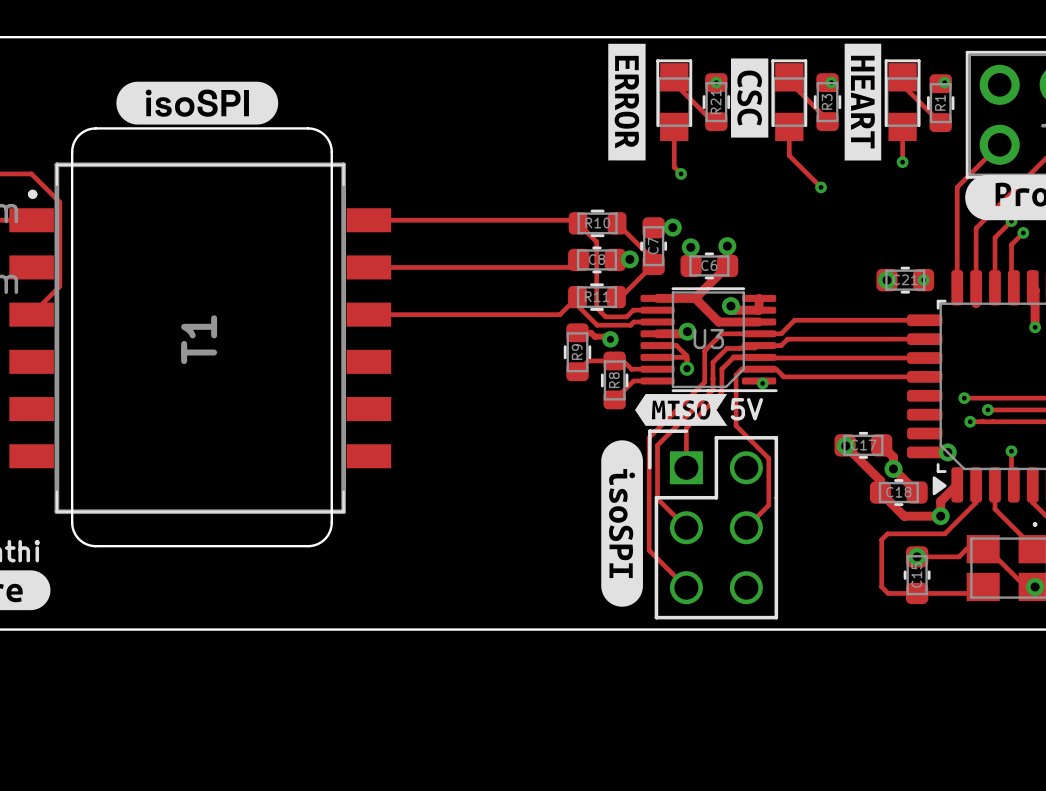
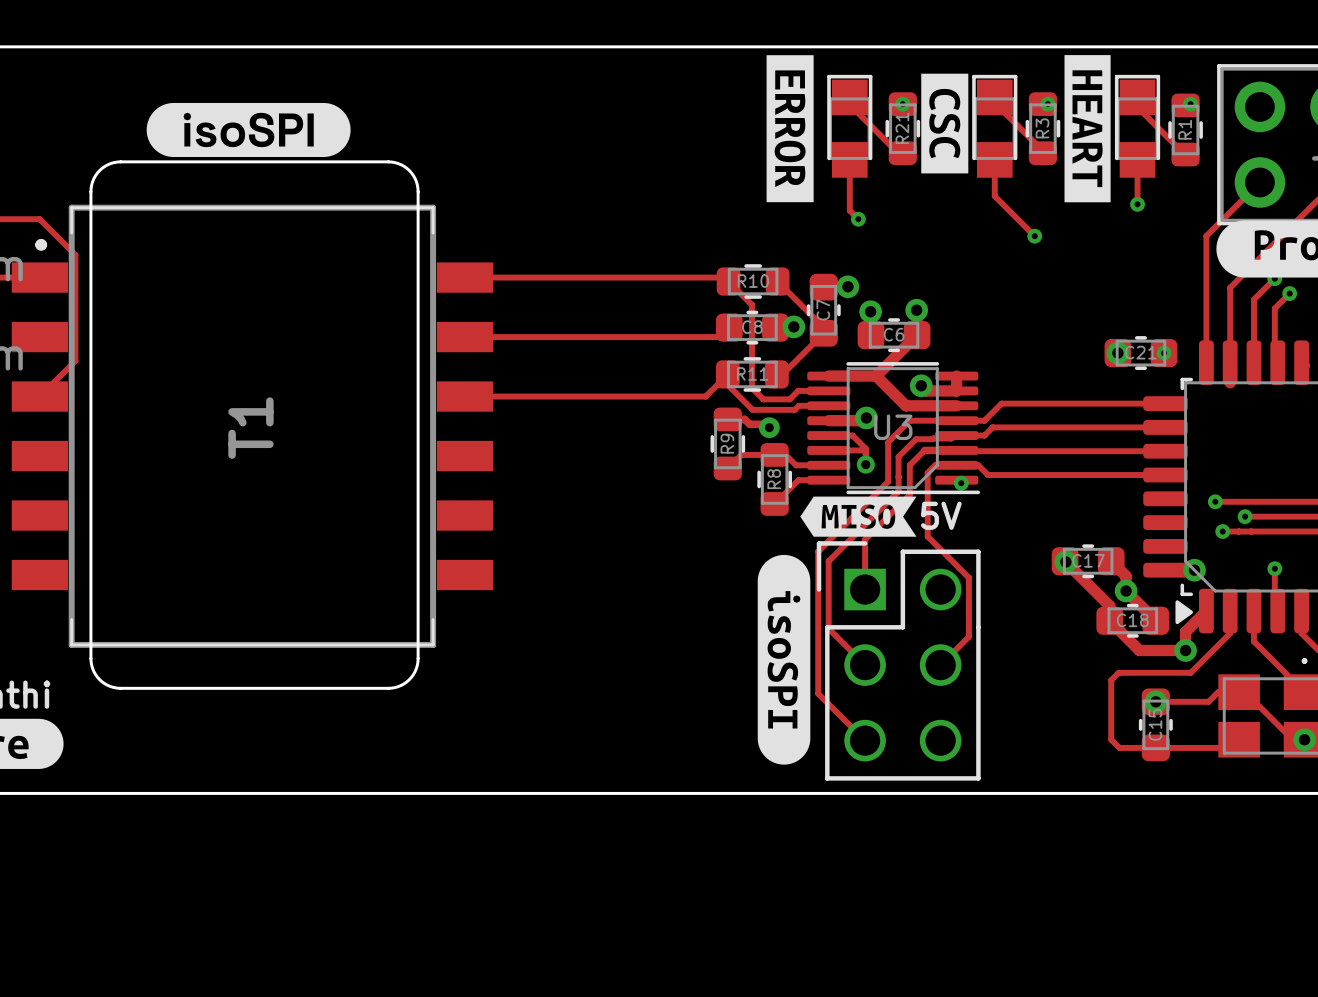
track: (1035, 290) (1035, 327) -> none
via: (1035, 327) -> none

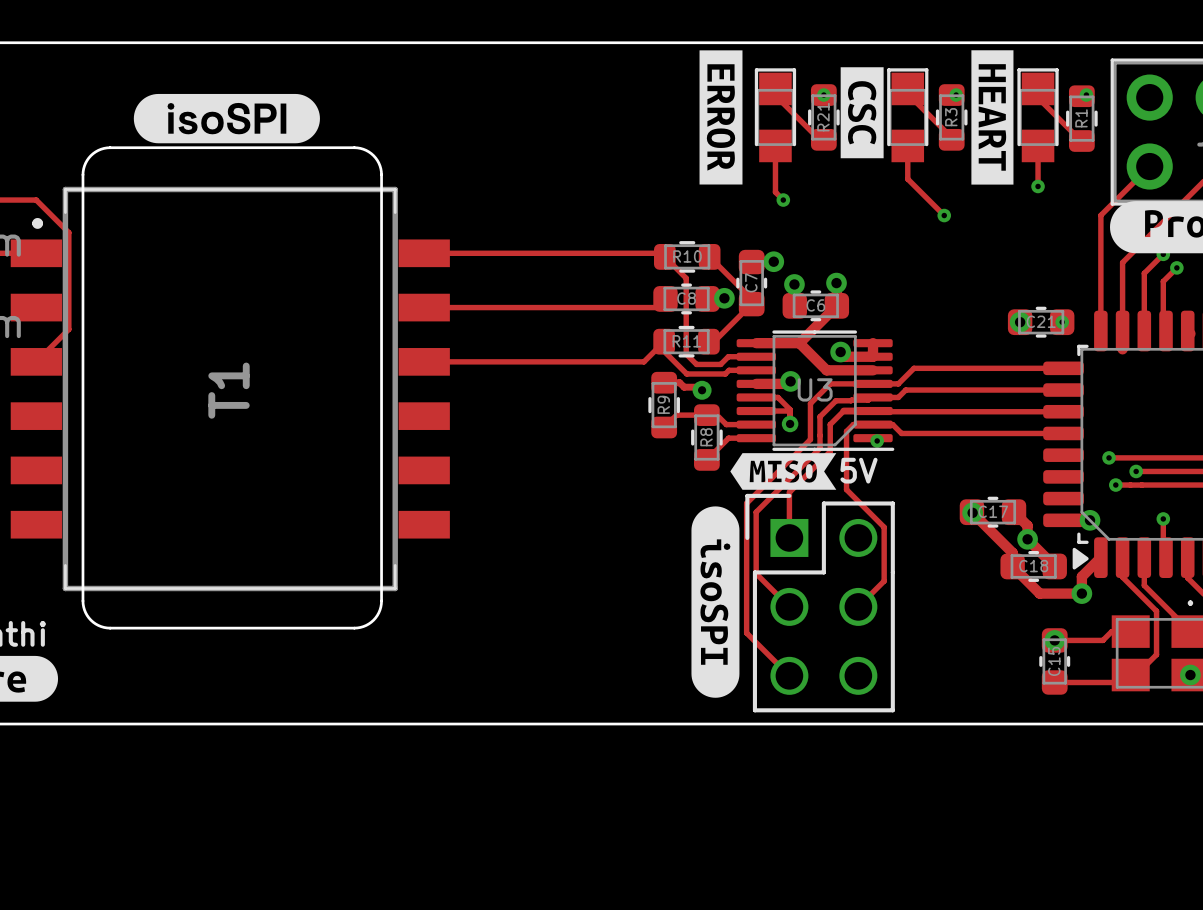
track: (1230, 632) (1190, 672) (1118, 672) (1111, 680) (1111, 739) (1119, 747) (1155, 747) -> (1122, 577) (1156, 611) (1156, 654) (1136, 675) (1130, 675)
track: (1245, 692) (1292, 739) -> none

